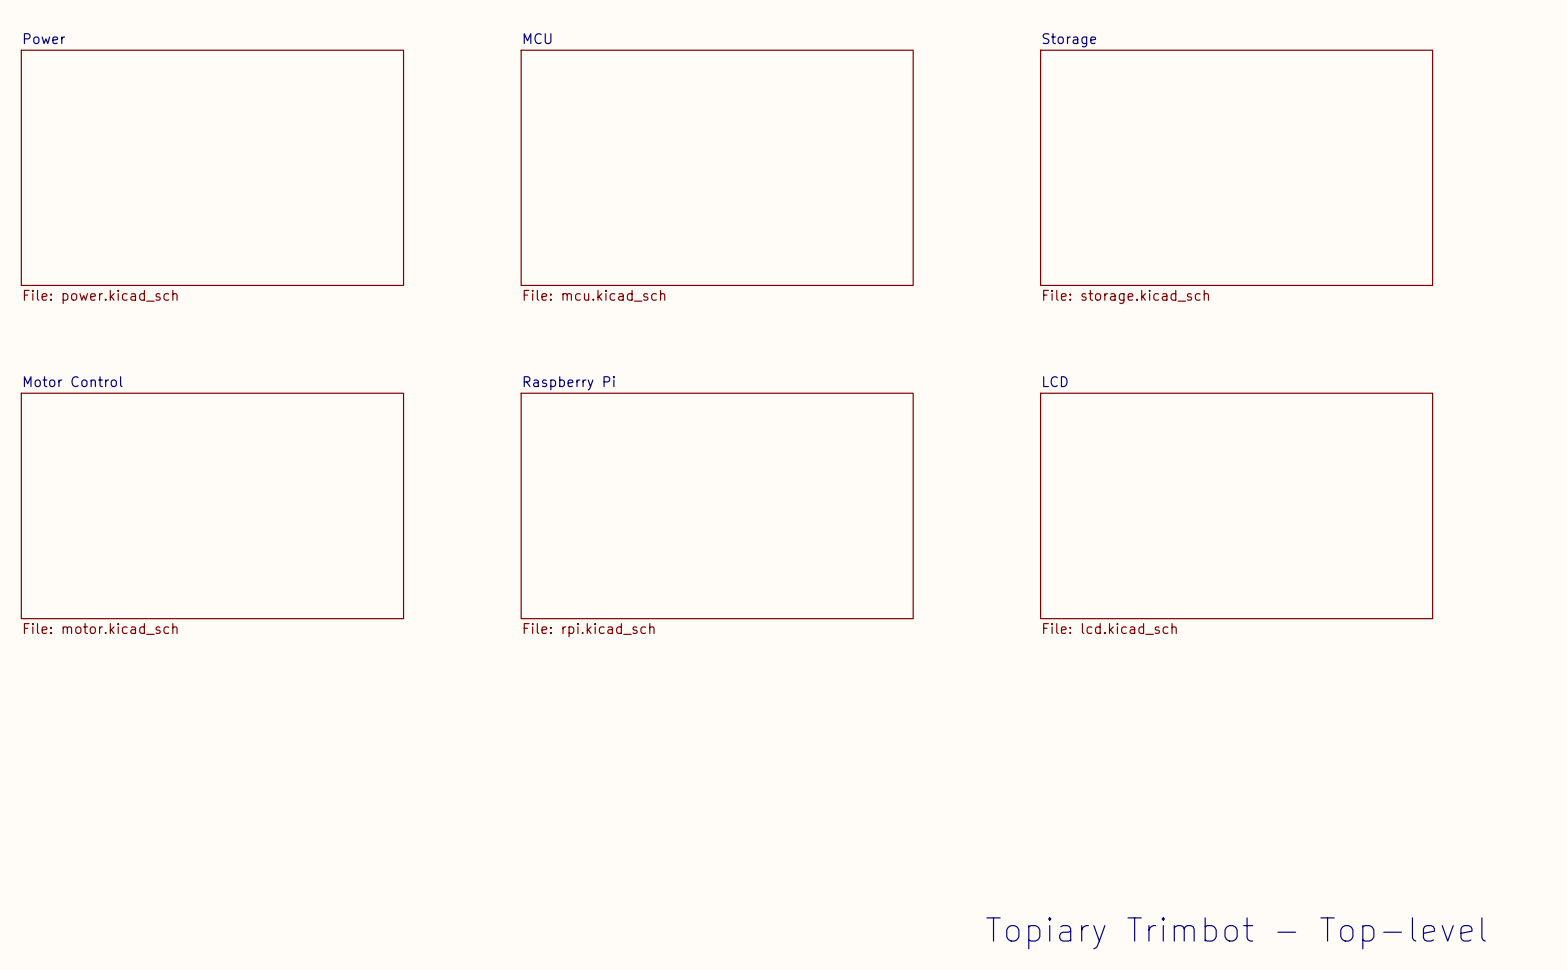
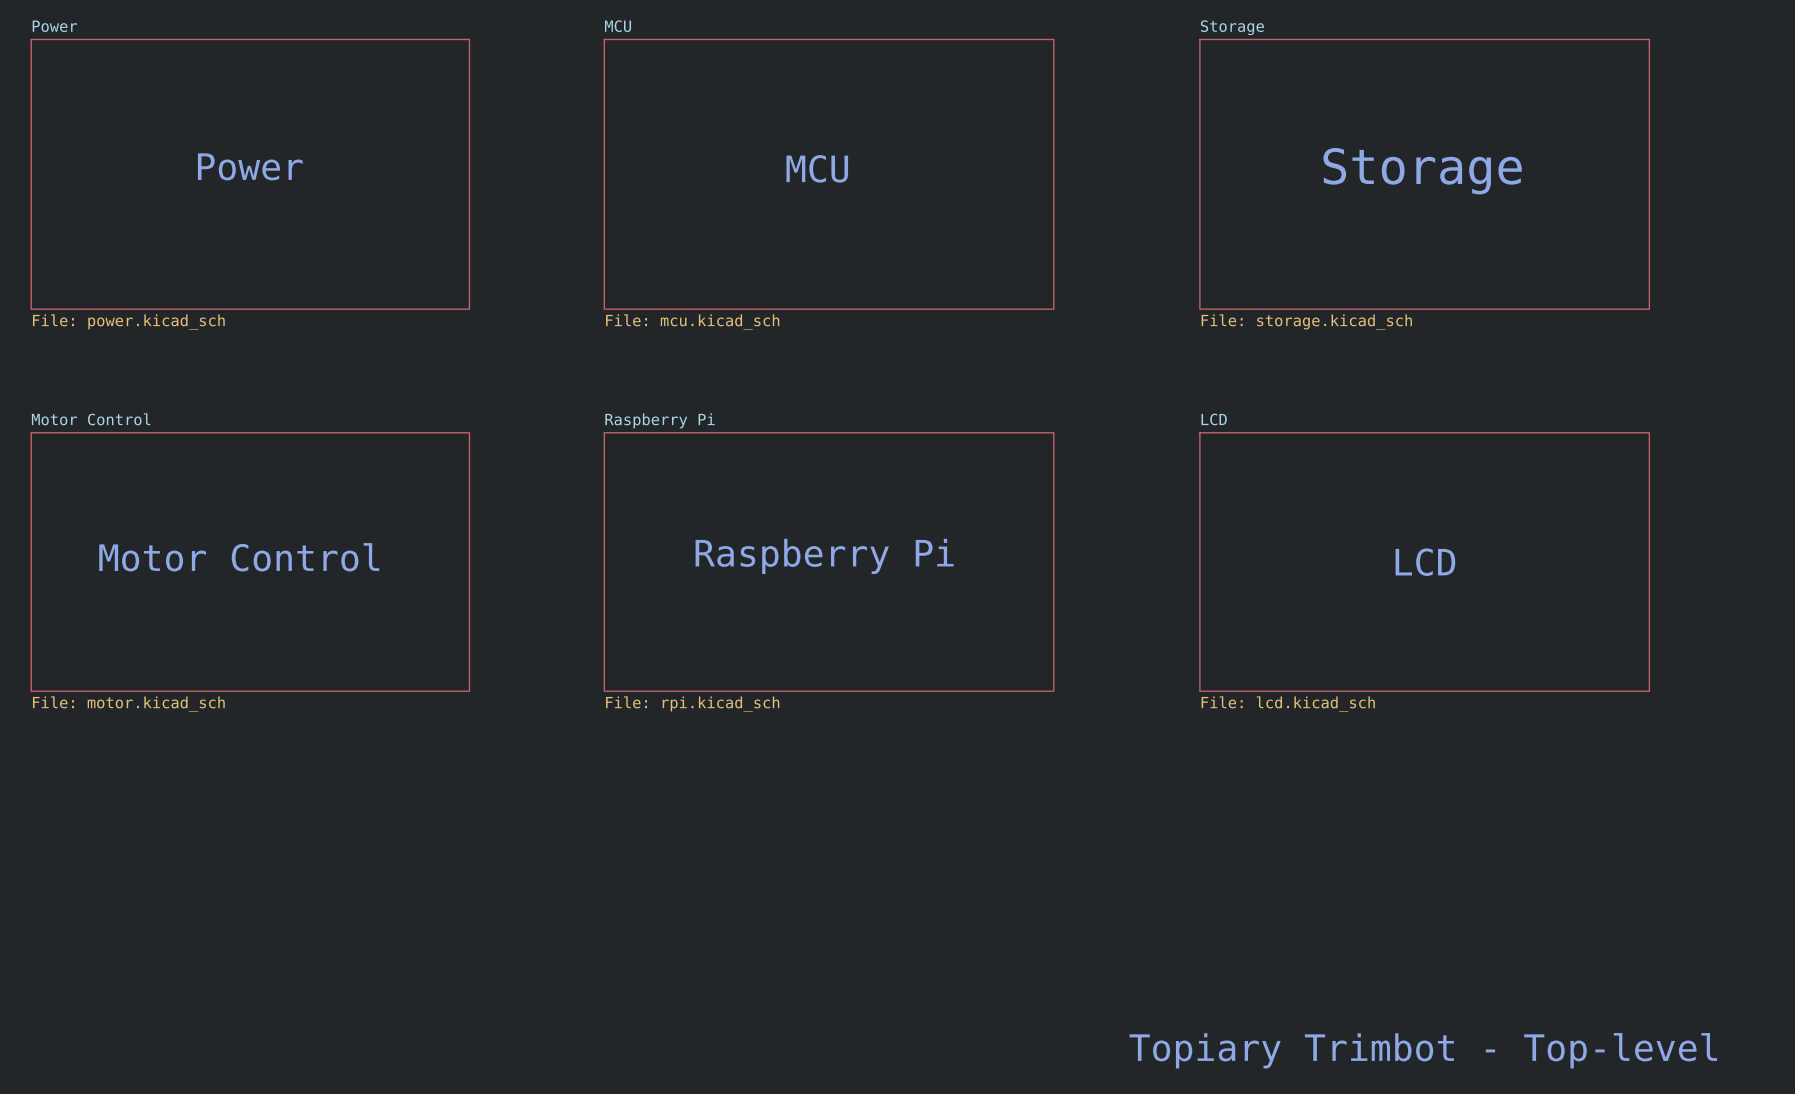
text: none -> Power (250, 166)
text: none -> MCU (817, 168)
text: none -> Storage (1422, 171)
text: none -> Motor Control (239, 557)
text: none -> Raspberry Pi (824, 556)
text: none -> LCD (1425, 562)

